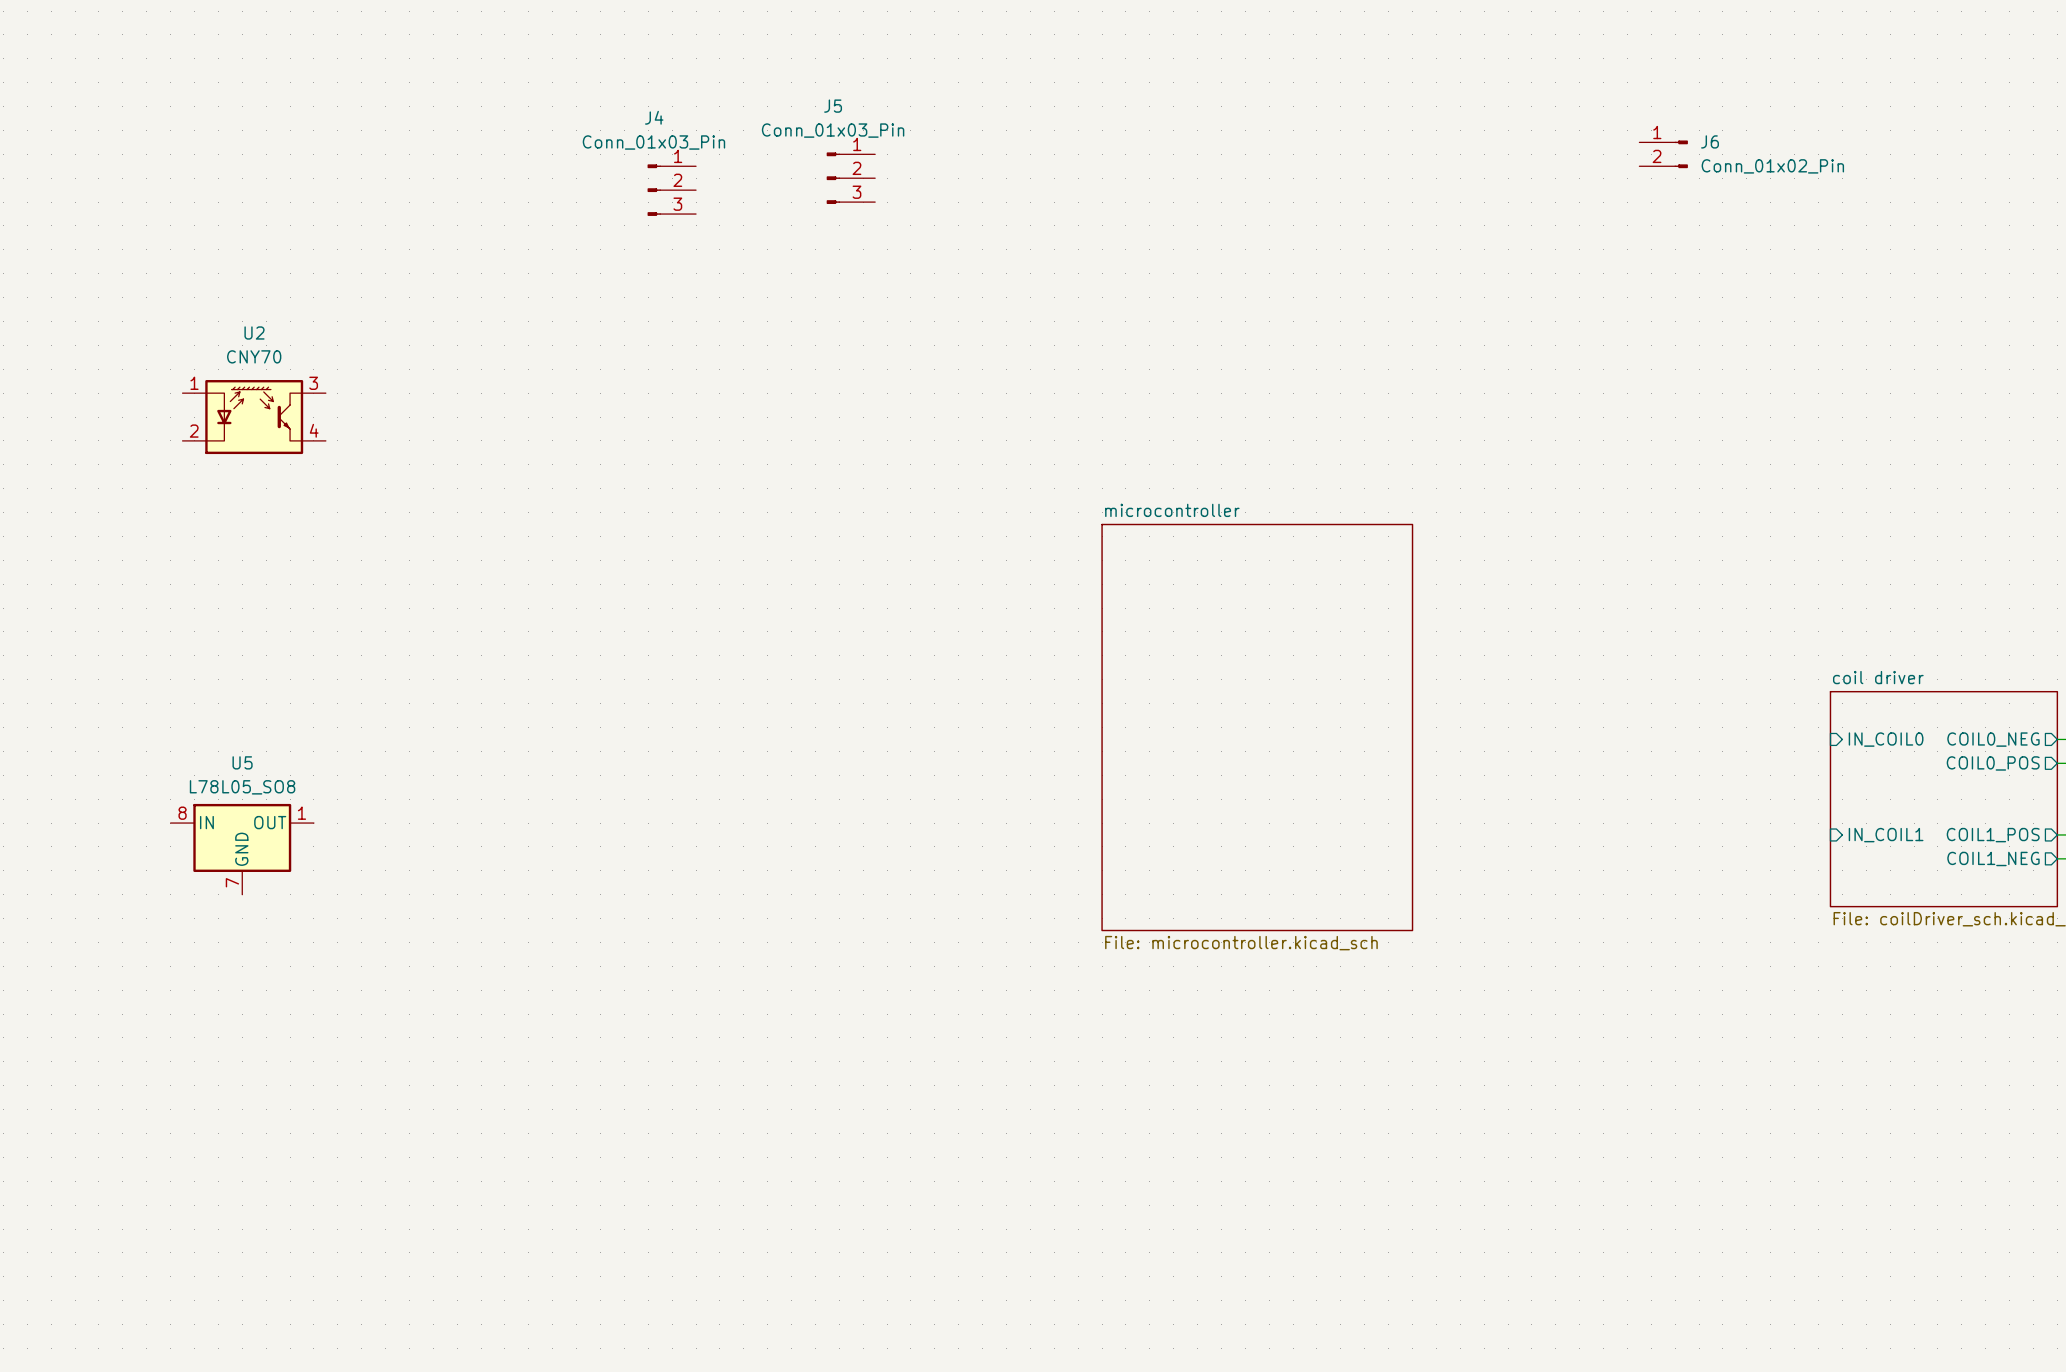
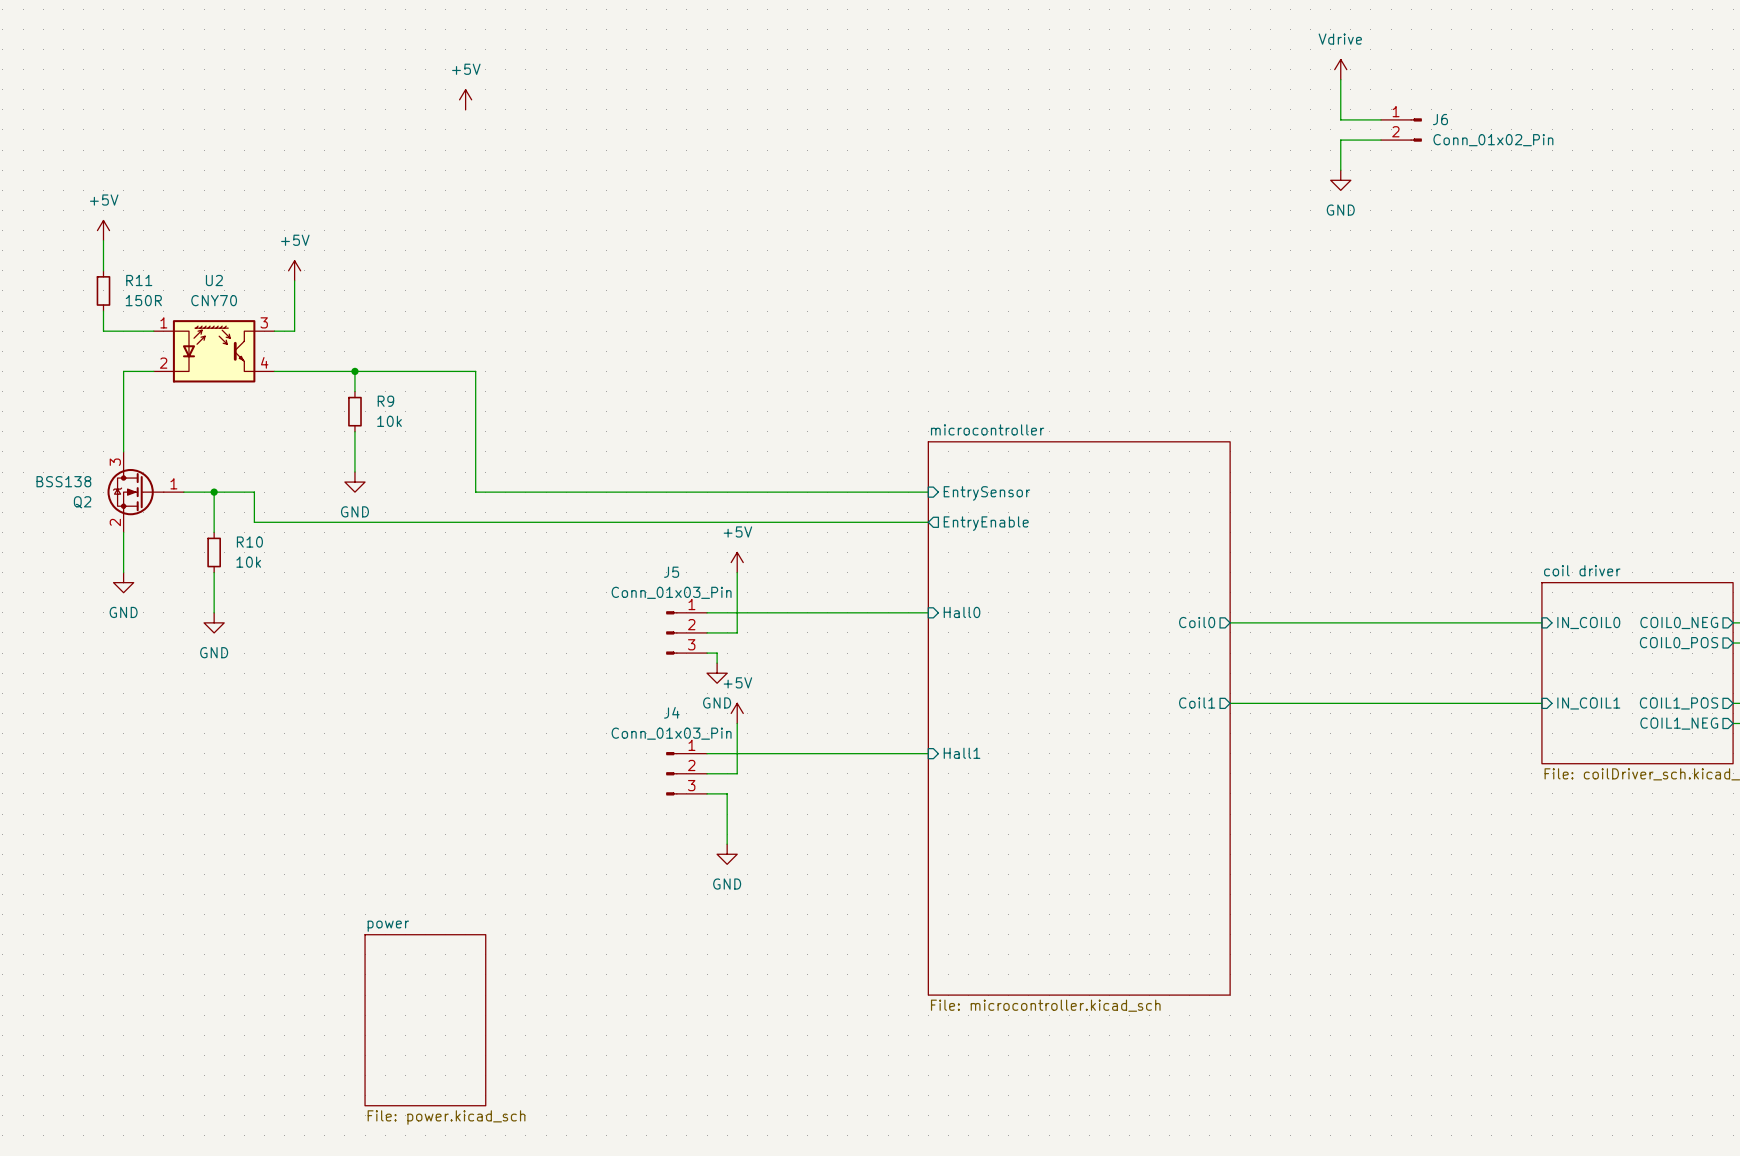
power symbol: none -> Vdrive (1340, 69)
wire: none -> (1340, 79) (1340, 119) (1380, 119)
power symbol: none -> +5V (465, 99)
wire: none -> (1380, 140) (1340, 140) (1340, 170)
J5 position: (850, 178) -> (686, 632)
J4 position: (671, 190) -> (686, 773)
power symbol: none -> GND (1340, 180)
power symbol: none -> +5V (103, 230)
wire: none -> (103, 240) (103, 270)
power symbol: none -> +5V (294, 270)
wire: none -> (294, 280) (294, 331) (274, 331)
R11: none -> 150R (103, 290)
wire: none -> (103, 311) (103, 331) (153, 331)
wire: none -> (153, 371) (123, 371) (123, 451)
wire: none -> (274, 371) (475, 371) (475, 492) (928, 492)
wire: none -> (354, 371) (354, 391)
junction: none -> (354, 371)
R9: none -> 10k (354, 411)
wire: none -> (354, 431) (354, 472)
power symbol: none -> GND (354, 482)
Q2: none -> BSS138 (145, 492)
wire: none -> (183, 492) (254, 492) (254, 522) (928, 522)
wire: none -> (214, 492) (214, 532)
junction: none -> (214, 492)
sheet pin: none -> EntrySensor (986, 493)
sheet pin: none -> EntryEnable (986, 523)
wire: none -> (123, 532) (123, 572)
R10: none -> 10k (214, 552)
power symbol: none -> +5V (737, 562)
wire: none -> (214, 572) (214, 612)
wire: none -> (737, 572) (737, 632) (707, 632)
power symbol: none -> GND (123, 582)
wire: none -> (707, 612) (928, 612)
sheet pin: none -> Hall0 (962, 612)
sheet microcontroller: File: microcontroller.kicad_sch (1257, 727) -> none
power symbol: none -> GND (214, 622)
sheet pin: none -> Coil0 (1197, 622)
wire: none -> (1230, 622) (1541, 622)
wire: none -> (707, 653) (717, 653) (717, 663)
power symbol: none -> GND (717, 673)
sheet pin: none -> Coil1 (1197, 702)
wire: none -> (1230, 703) (1541, 703)
power symbol: none -> +5V (737, 713)
U5: L78L05_SO8 (242, 849) -> none
sheet microcontroller: none -> File: microcontroller.kicad_sch (1079, 718)
wire: none -> (737, 723) (737, 773) (707, 773)
wire: none -> (707, 753) (928, 753)
sheet pin: none -> Hall1 (962, 753)
wire: none -> (707, 793) (727, 793) (727, 844)
power symbol: none -> GND (727, 854)
sheet power: none -> File: power.kicad_sch (425, 1020)

